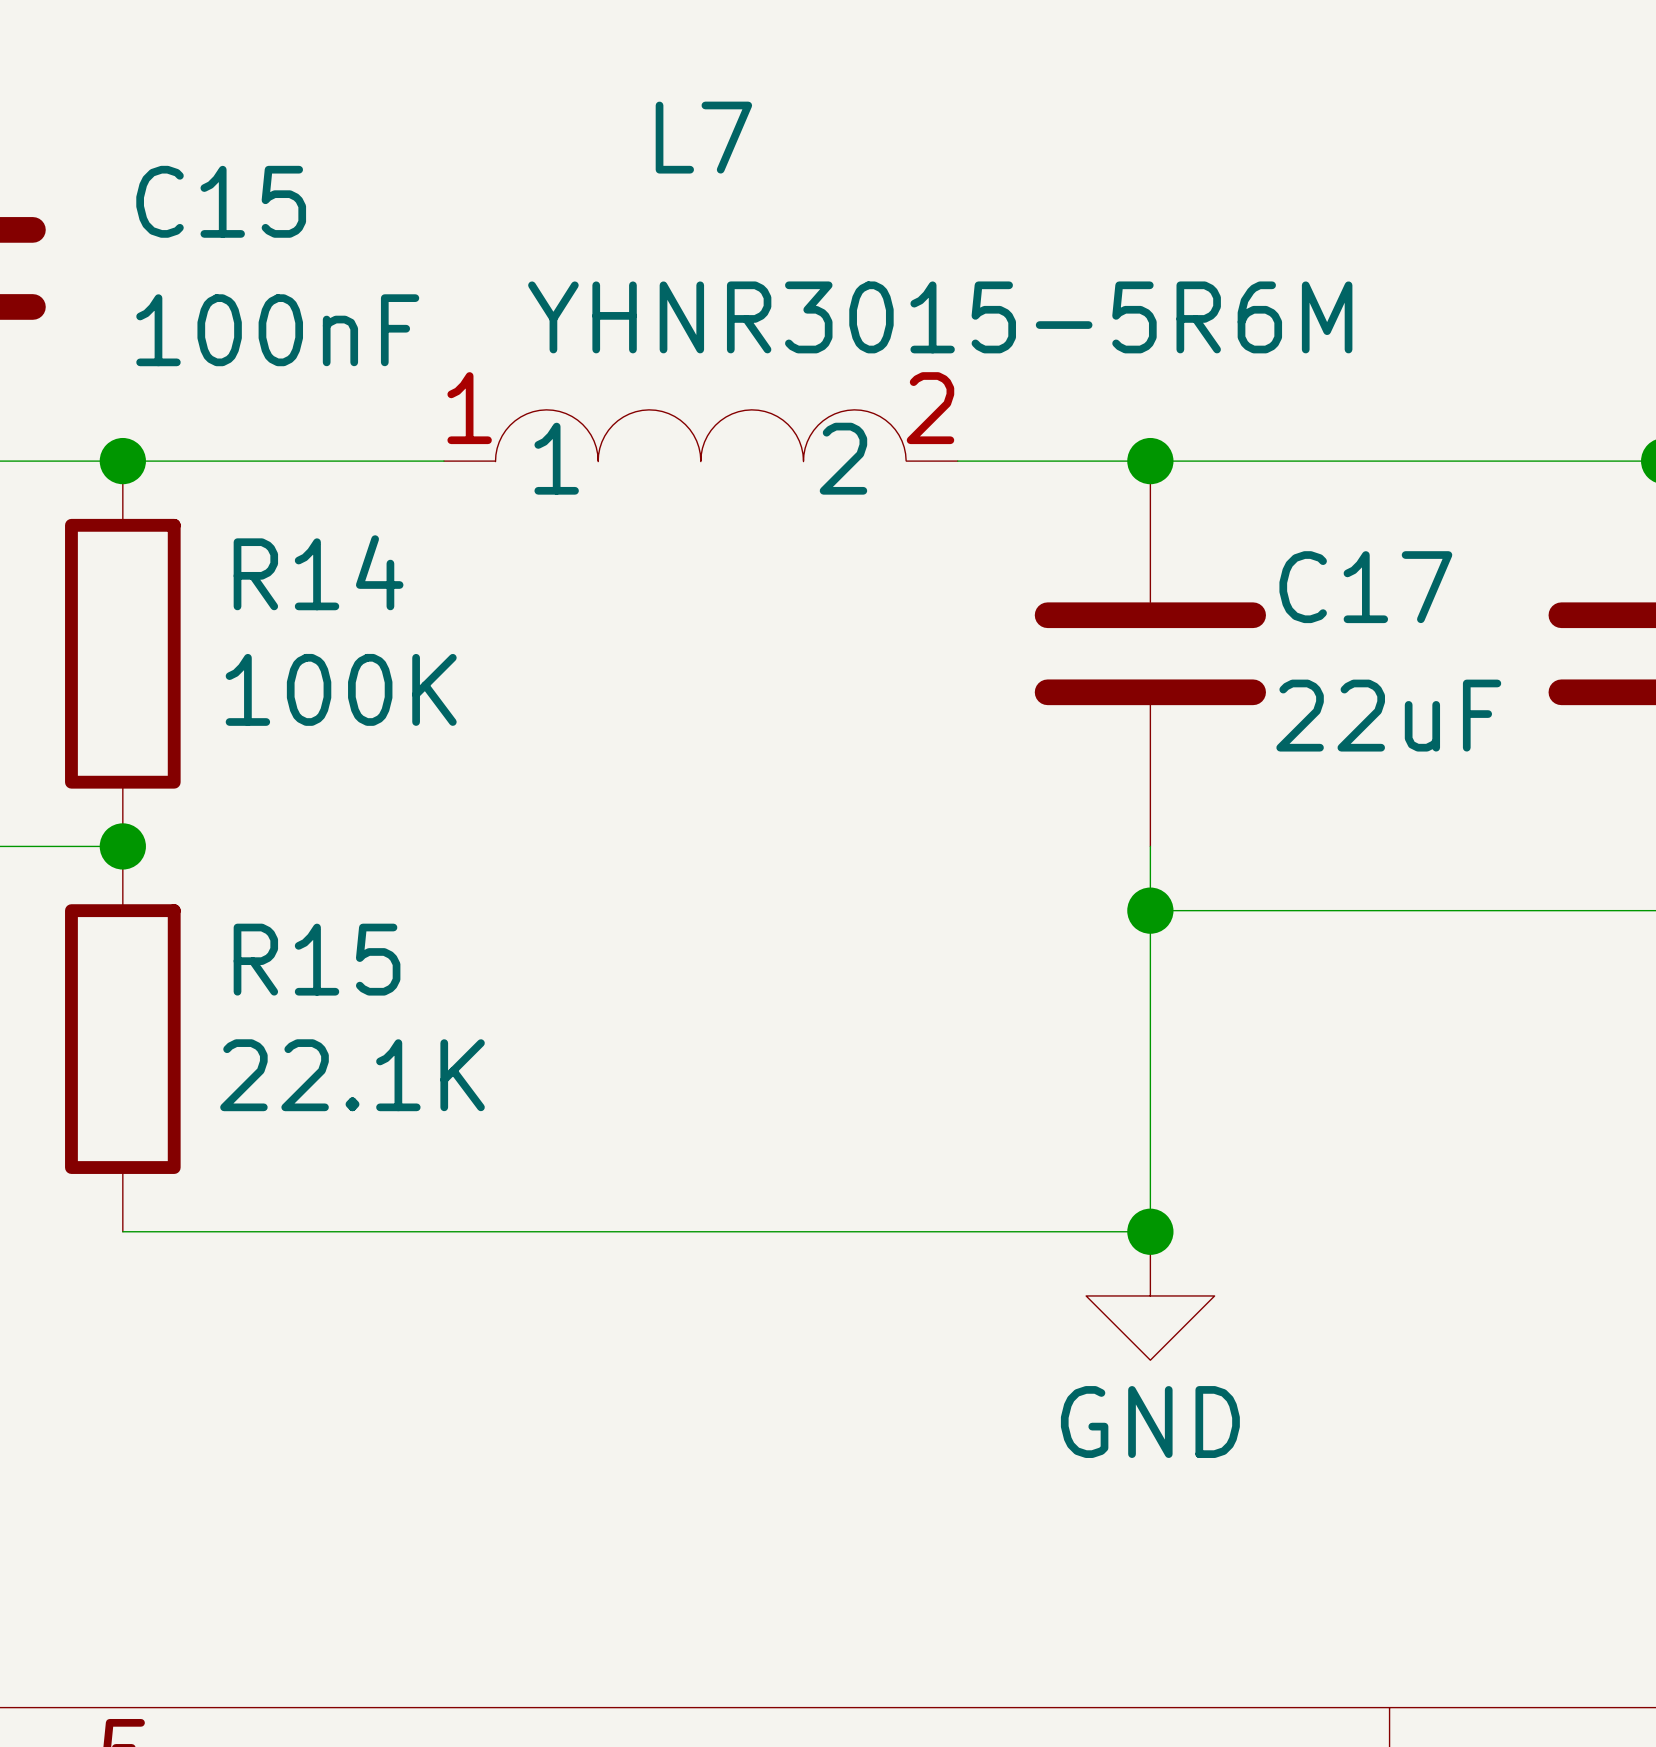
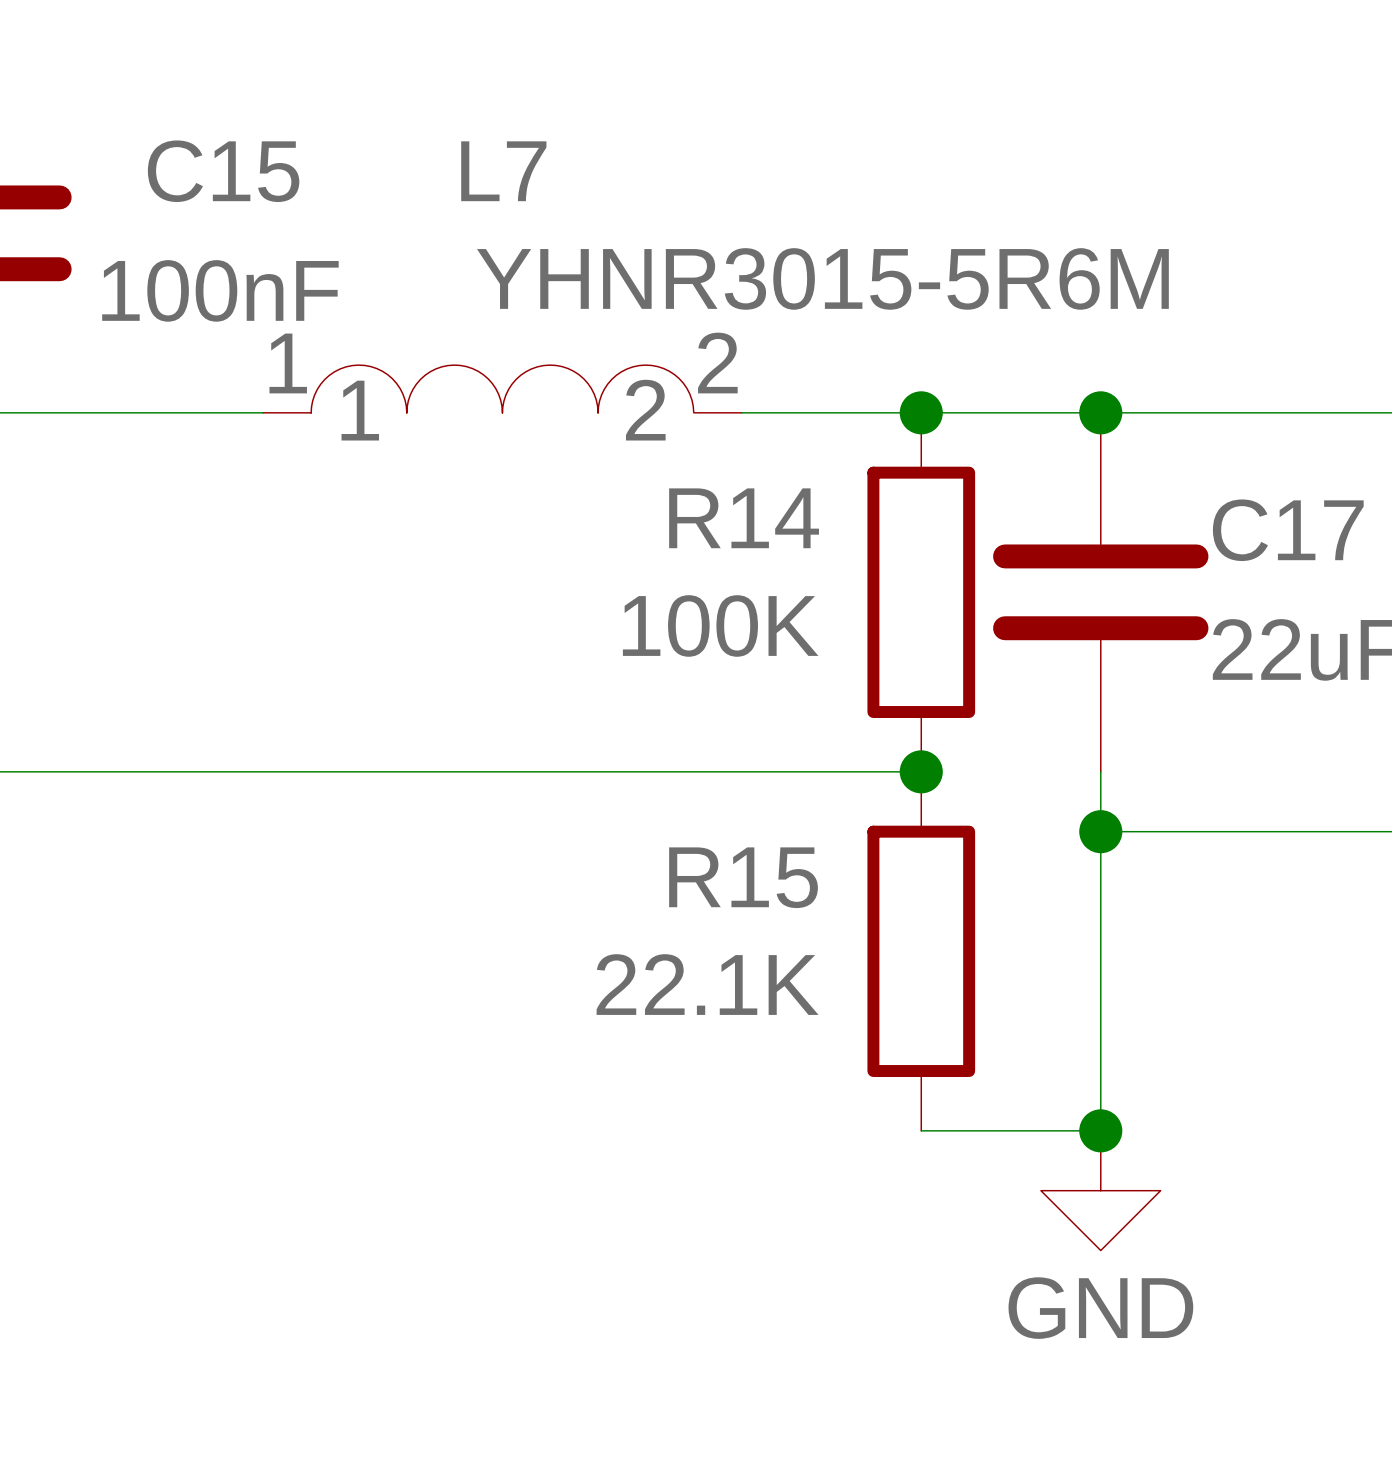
L7 name position: L7 (703, 137) -> L7 (503, 171)
L7 value position: YHNR3015-5R6M (940, 317) -> YHNR3015-5R6M (822, 278)
C15 value position: 100nF (277, 330) -> 100nF (220, 290)
L7 position: (700, 435) -> (502, 389)
junction: (122, 461) -> none
wire: (251, 461) (443, 461) -> (741, 412) (921, 412)
junction: none -> (921, 412)
R14 name position: R14 (318, 572) -> R14 (744, 518)
R14 position: (122, 653) -> (921, 592)
R14 value position: 100K (341, 689) -> 100K (720, 625)
junction: (122, 846) -> none
junction: none -> (921, 771)
R15 name position: R15 (317, 959) -> R15 (743, 877)
R15 position: (122, 1039) -> (921, 951)
R15 value position: 22.1K (352, 1075) -> 22.1K (707, 984)
wire: (122, 1231) (957, 1231) -> (143, 771) (921, 771)

